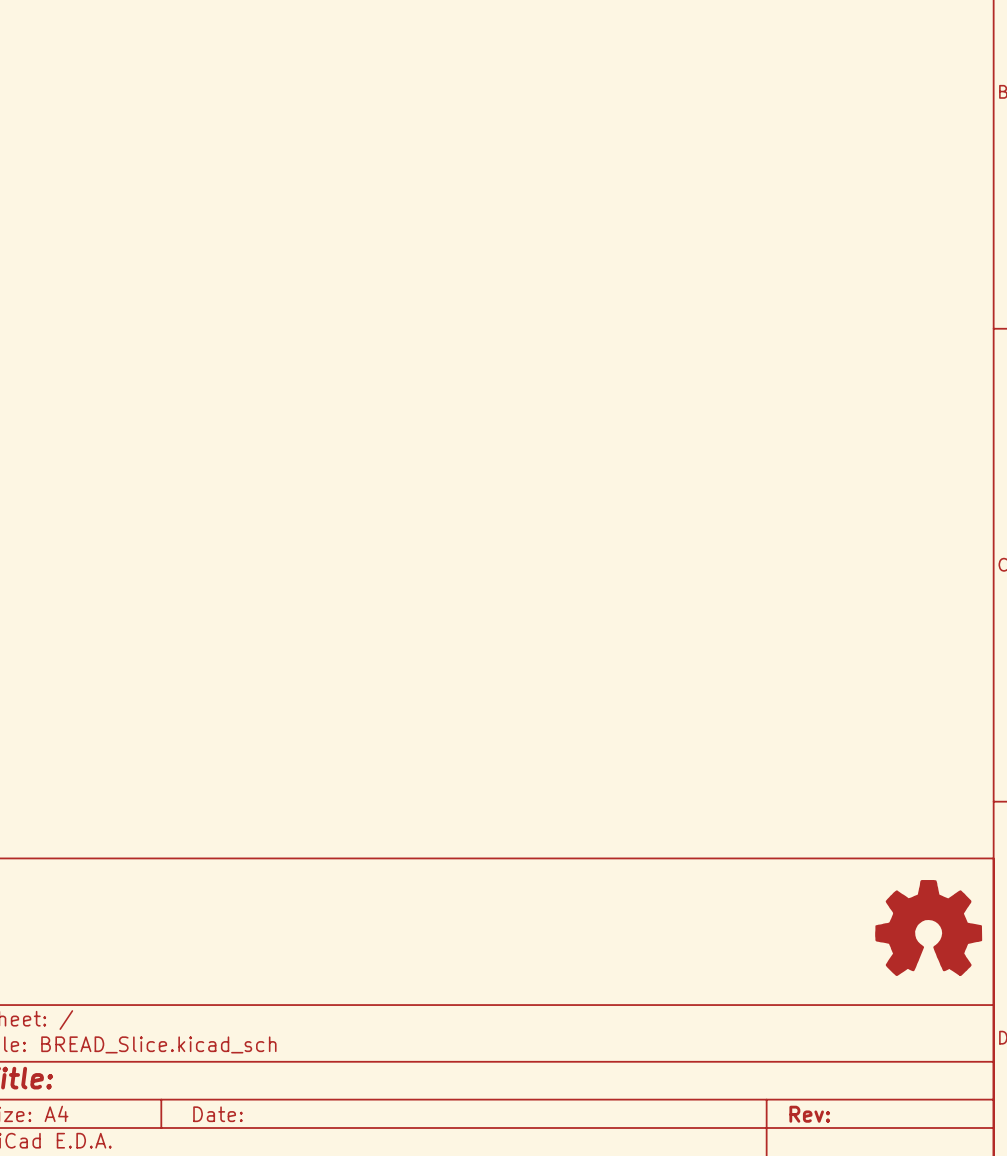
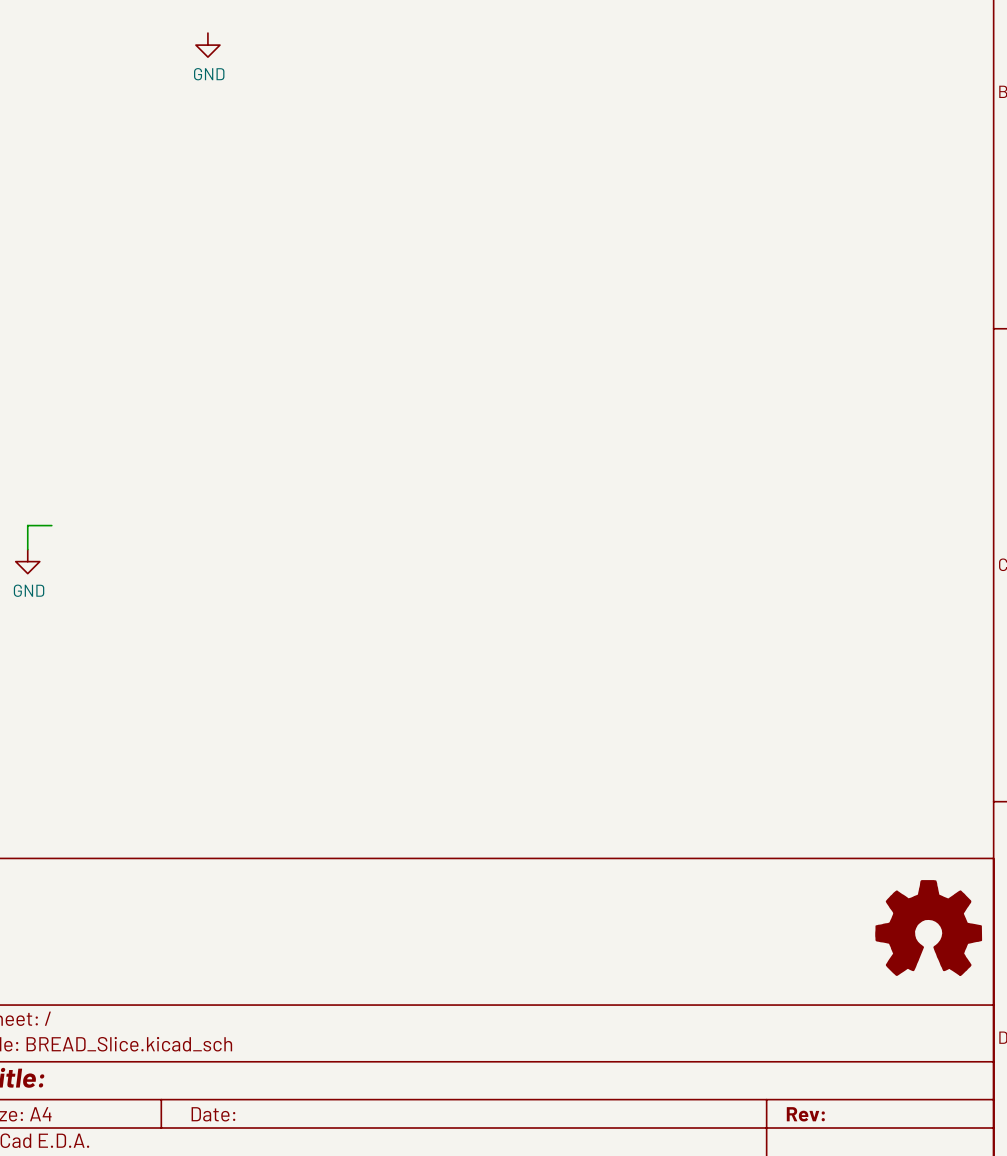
power symbol: none -> GND (207, 45)
wire: none -> (51, 525) (27, 525) (27, 549)
power symbol: none -> GND (27, 561)

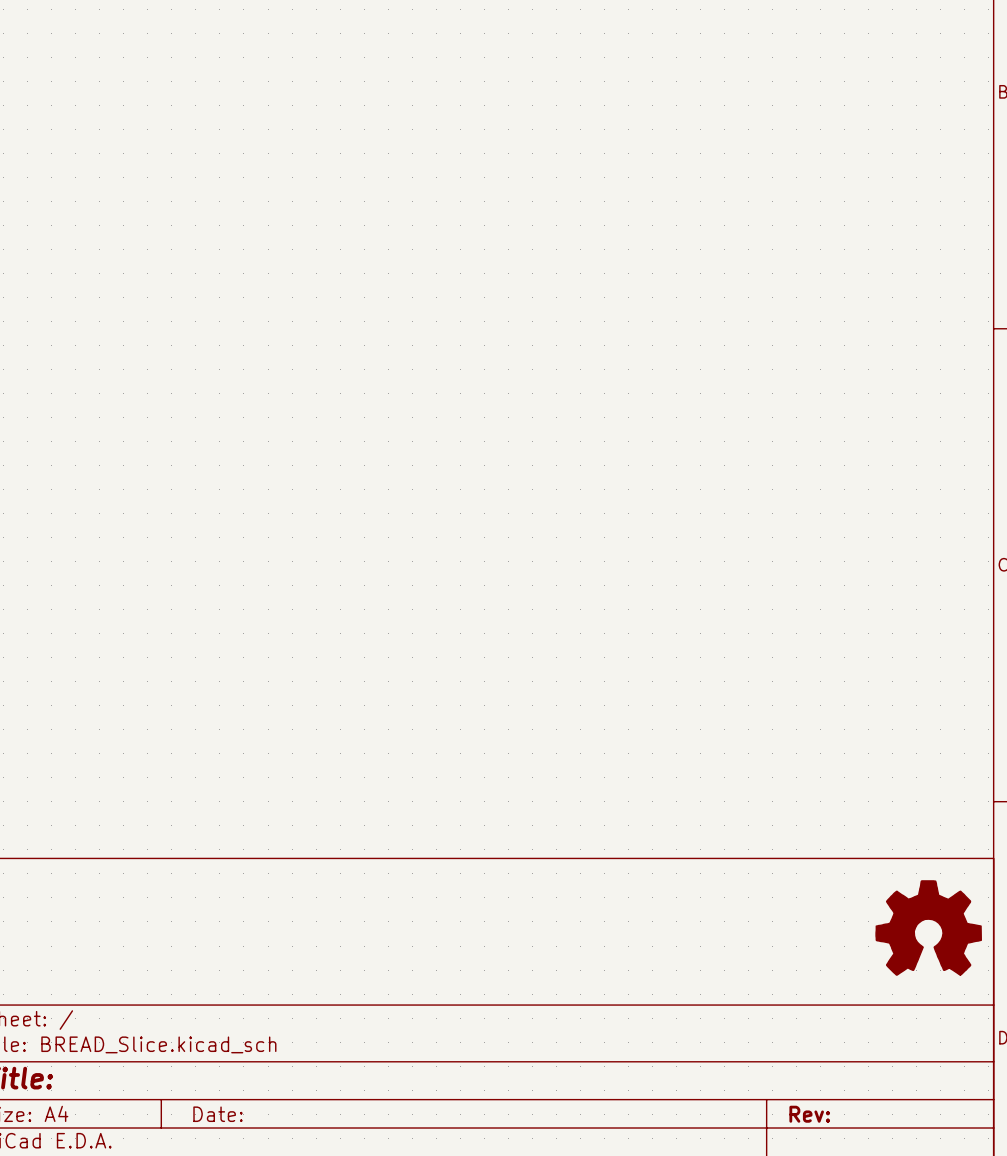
power symbol: GND (207, 45) -> none
wire: (51, 525) (27, 525) (27, 549) -> none
power symbol: GND (27, 561) -> none

